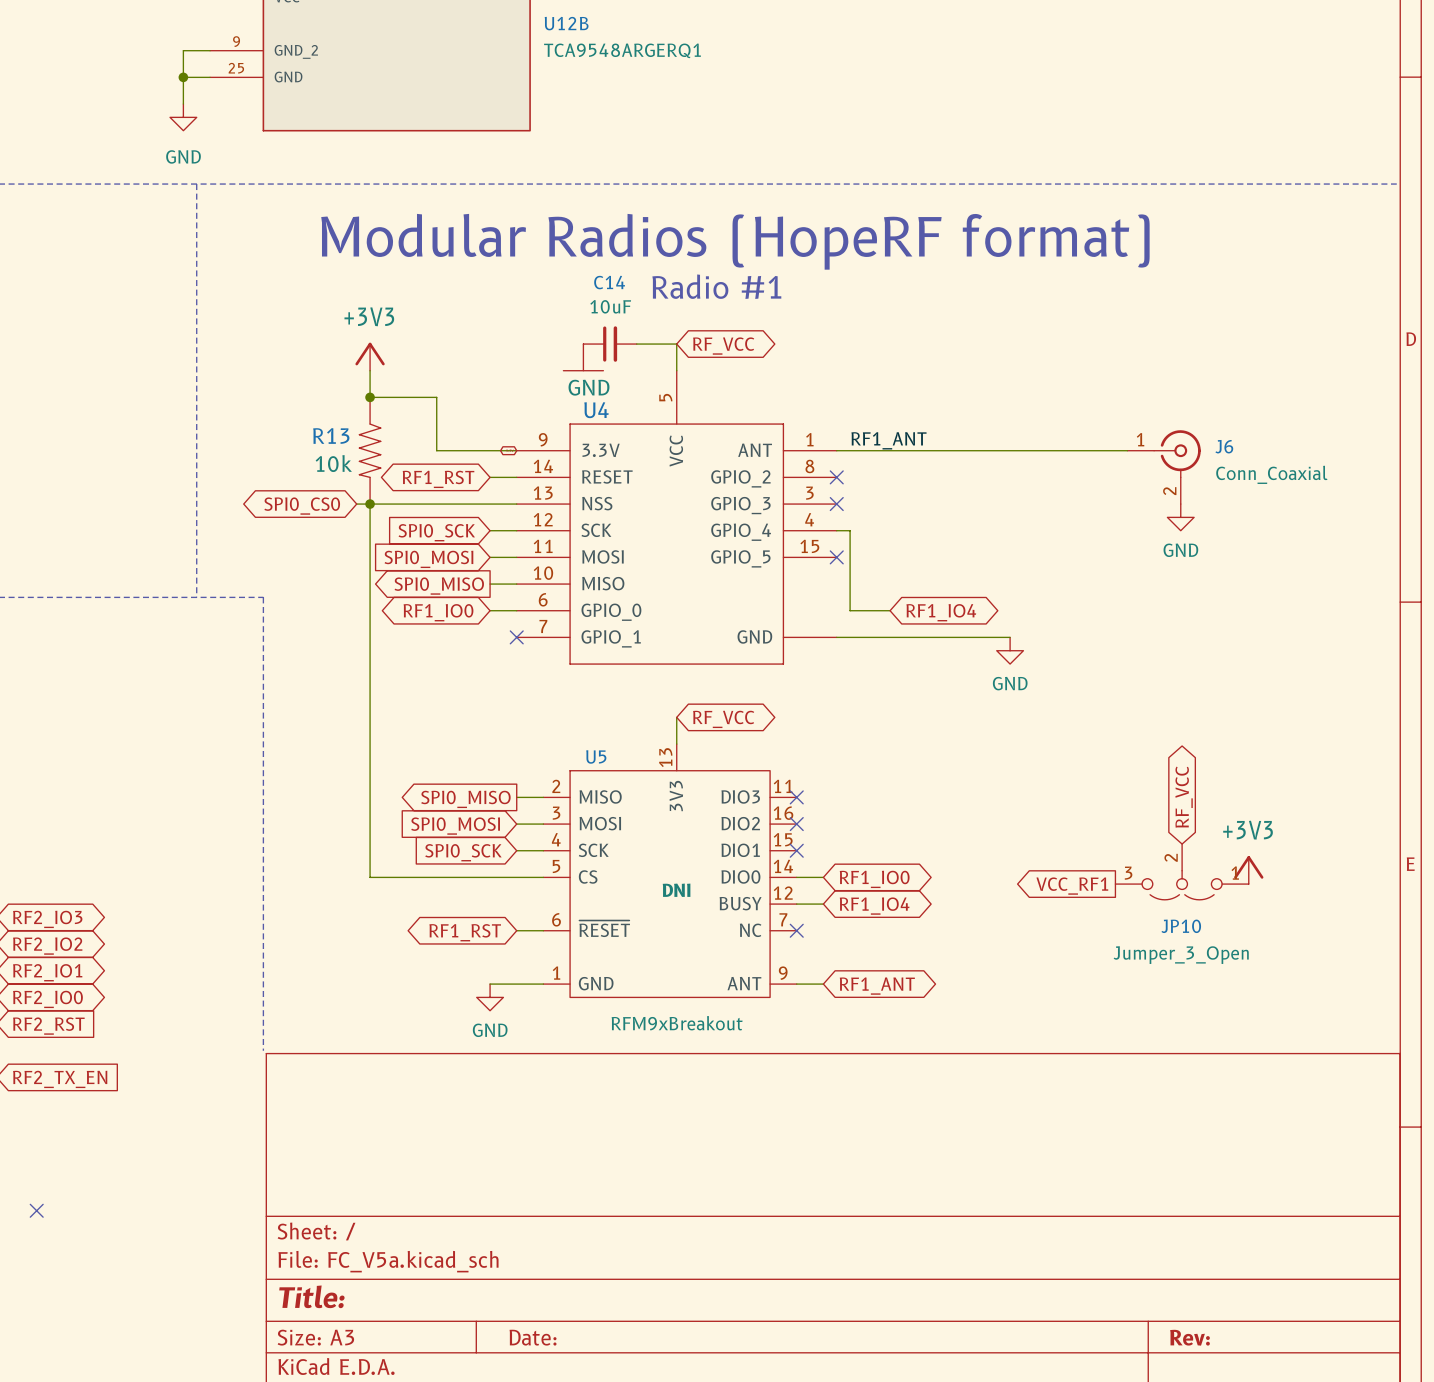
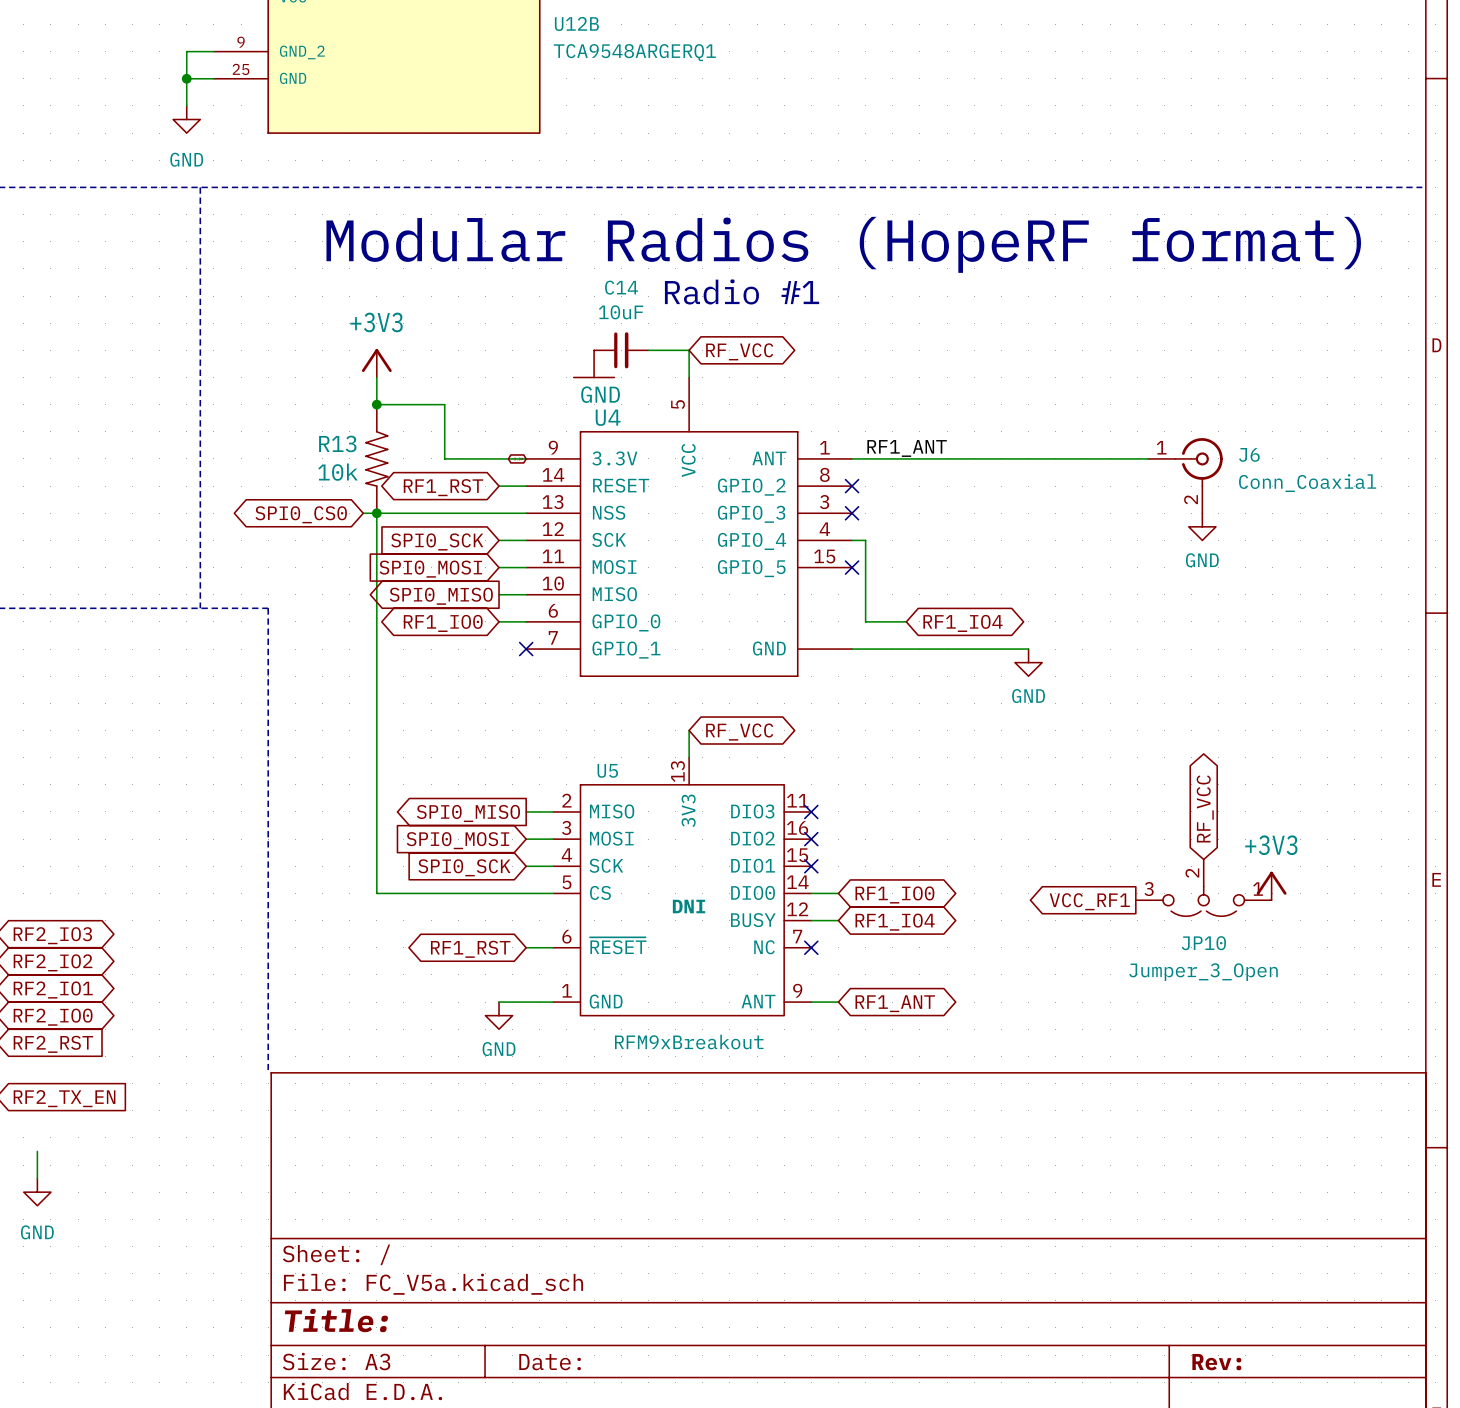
wire: none -> (37, 1151) (37, 1178)
power symbol: none -> GND (37, 1192)
no-connect mark: (36, 1210) -> none

